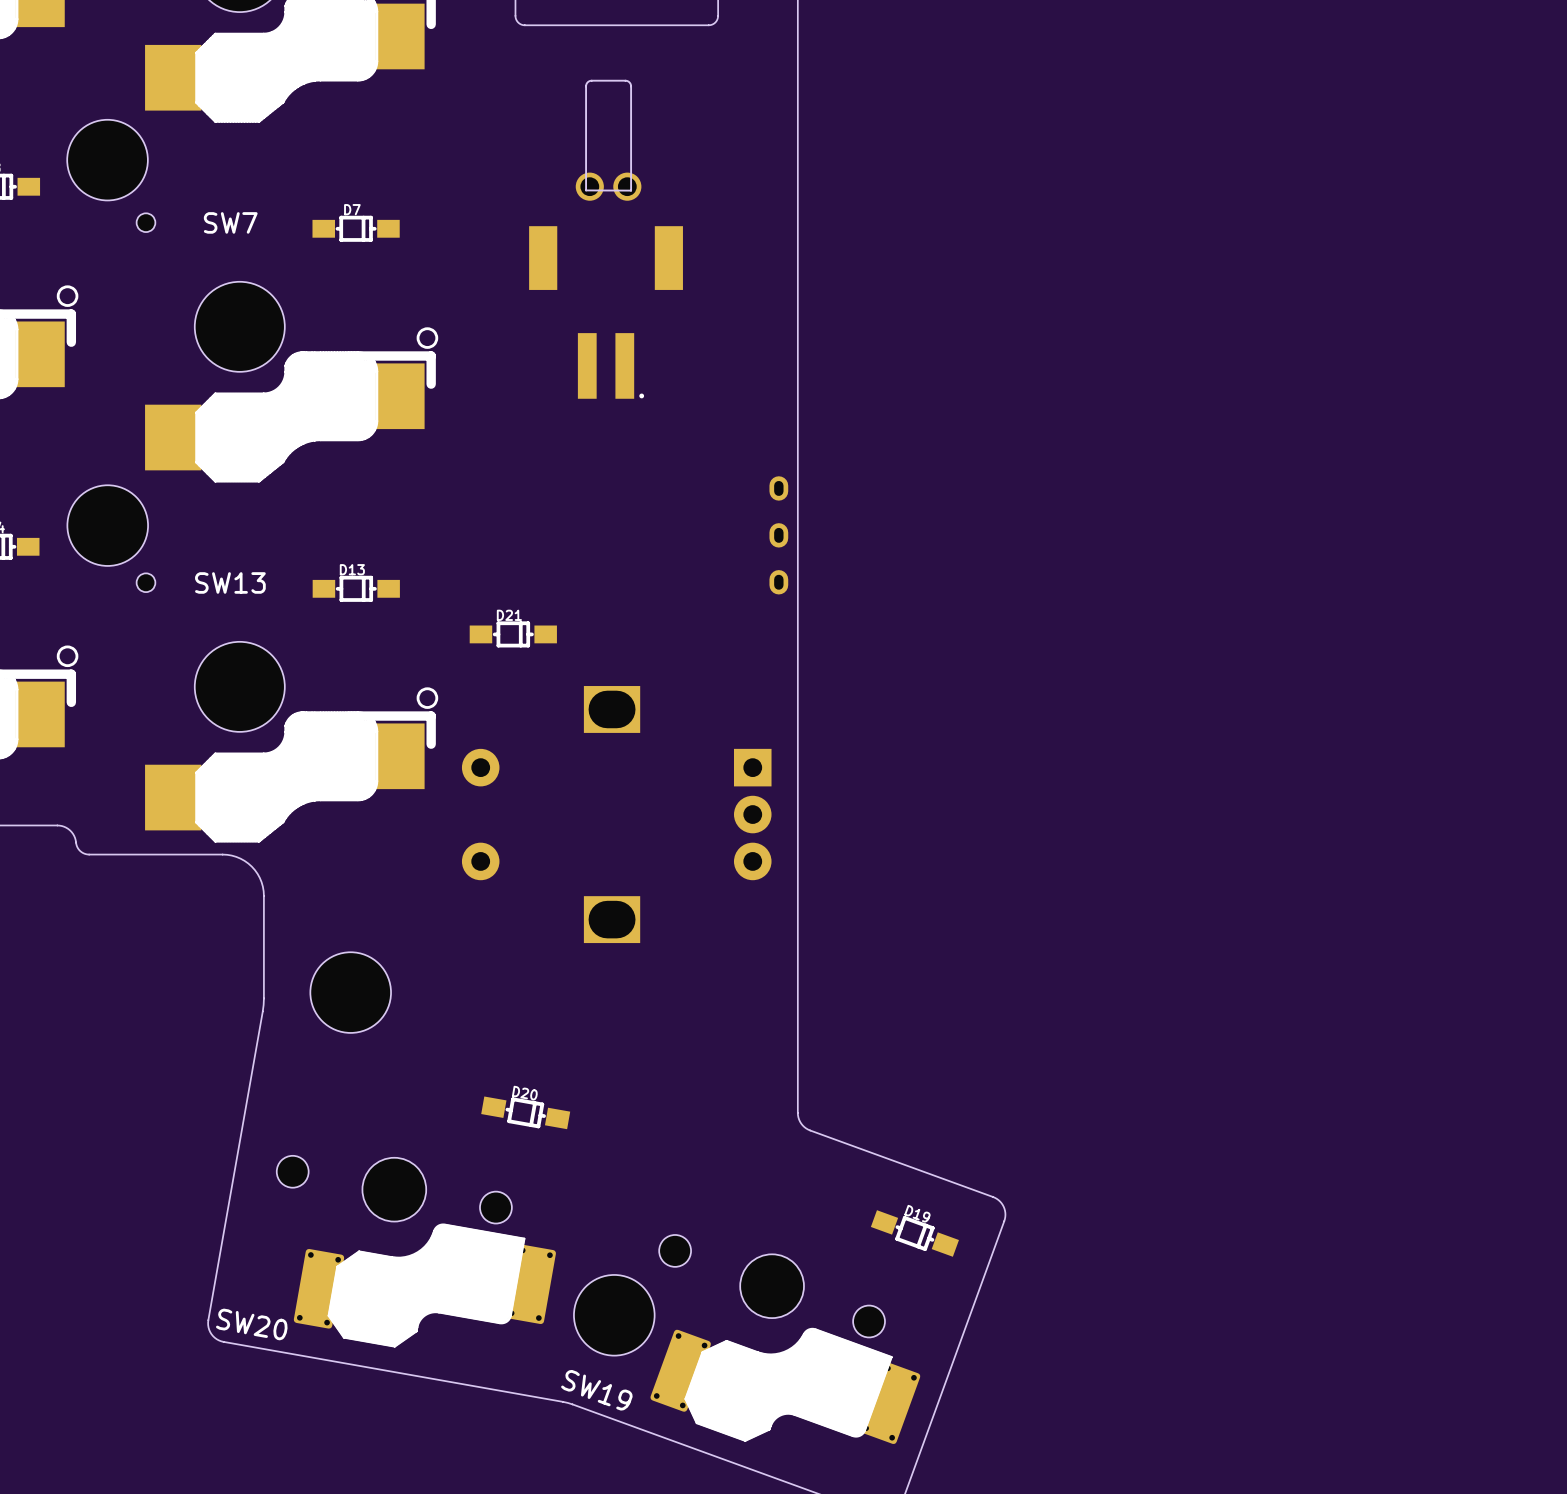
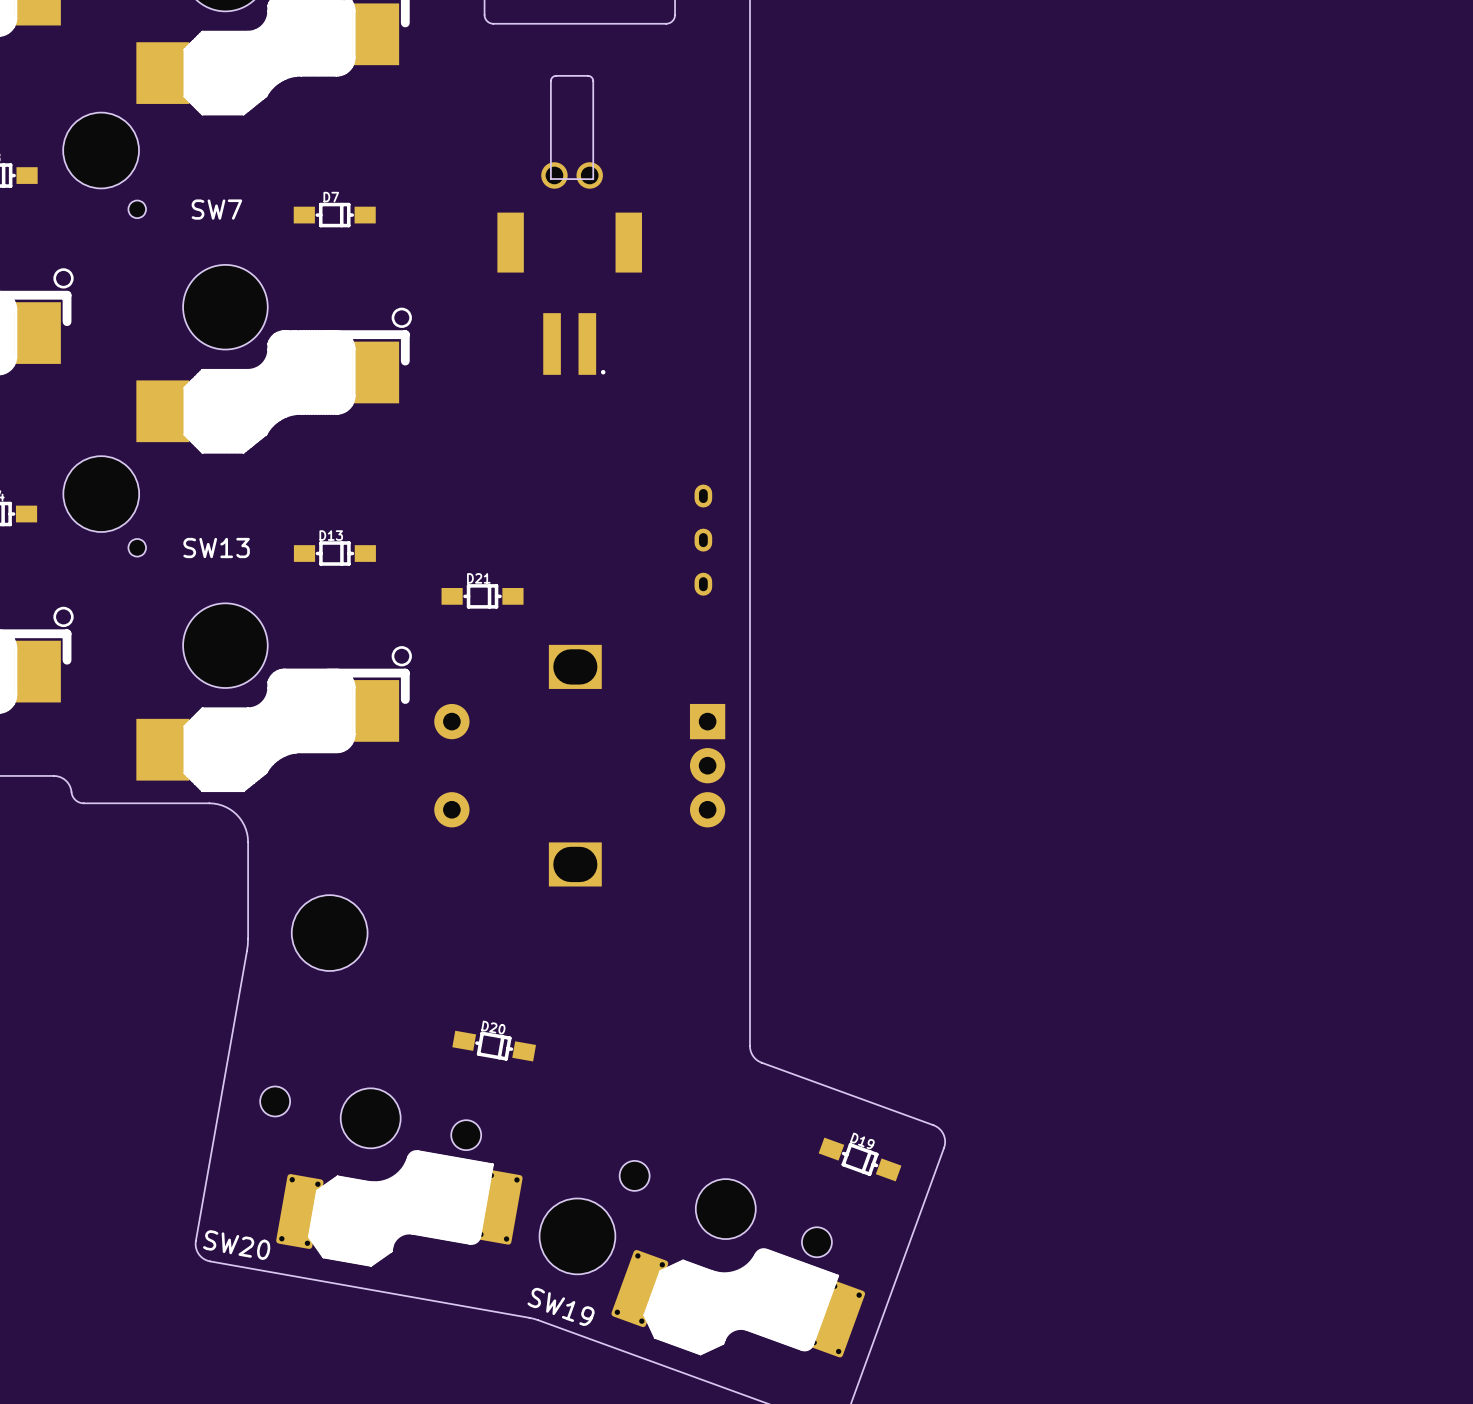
part position: (778, 535) -> (703, 540)

